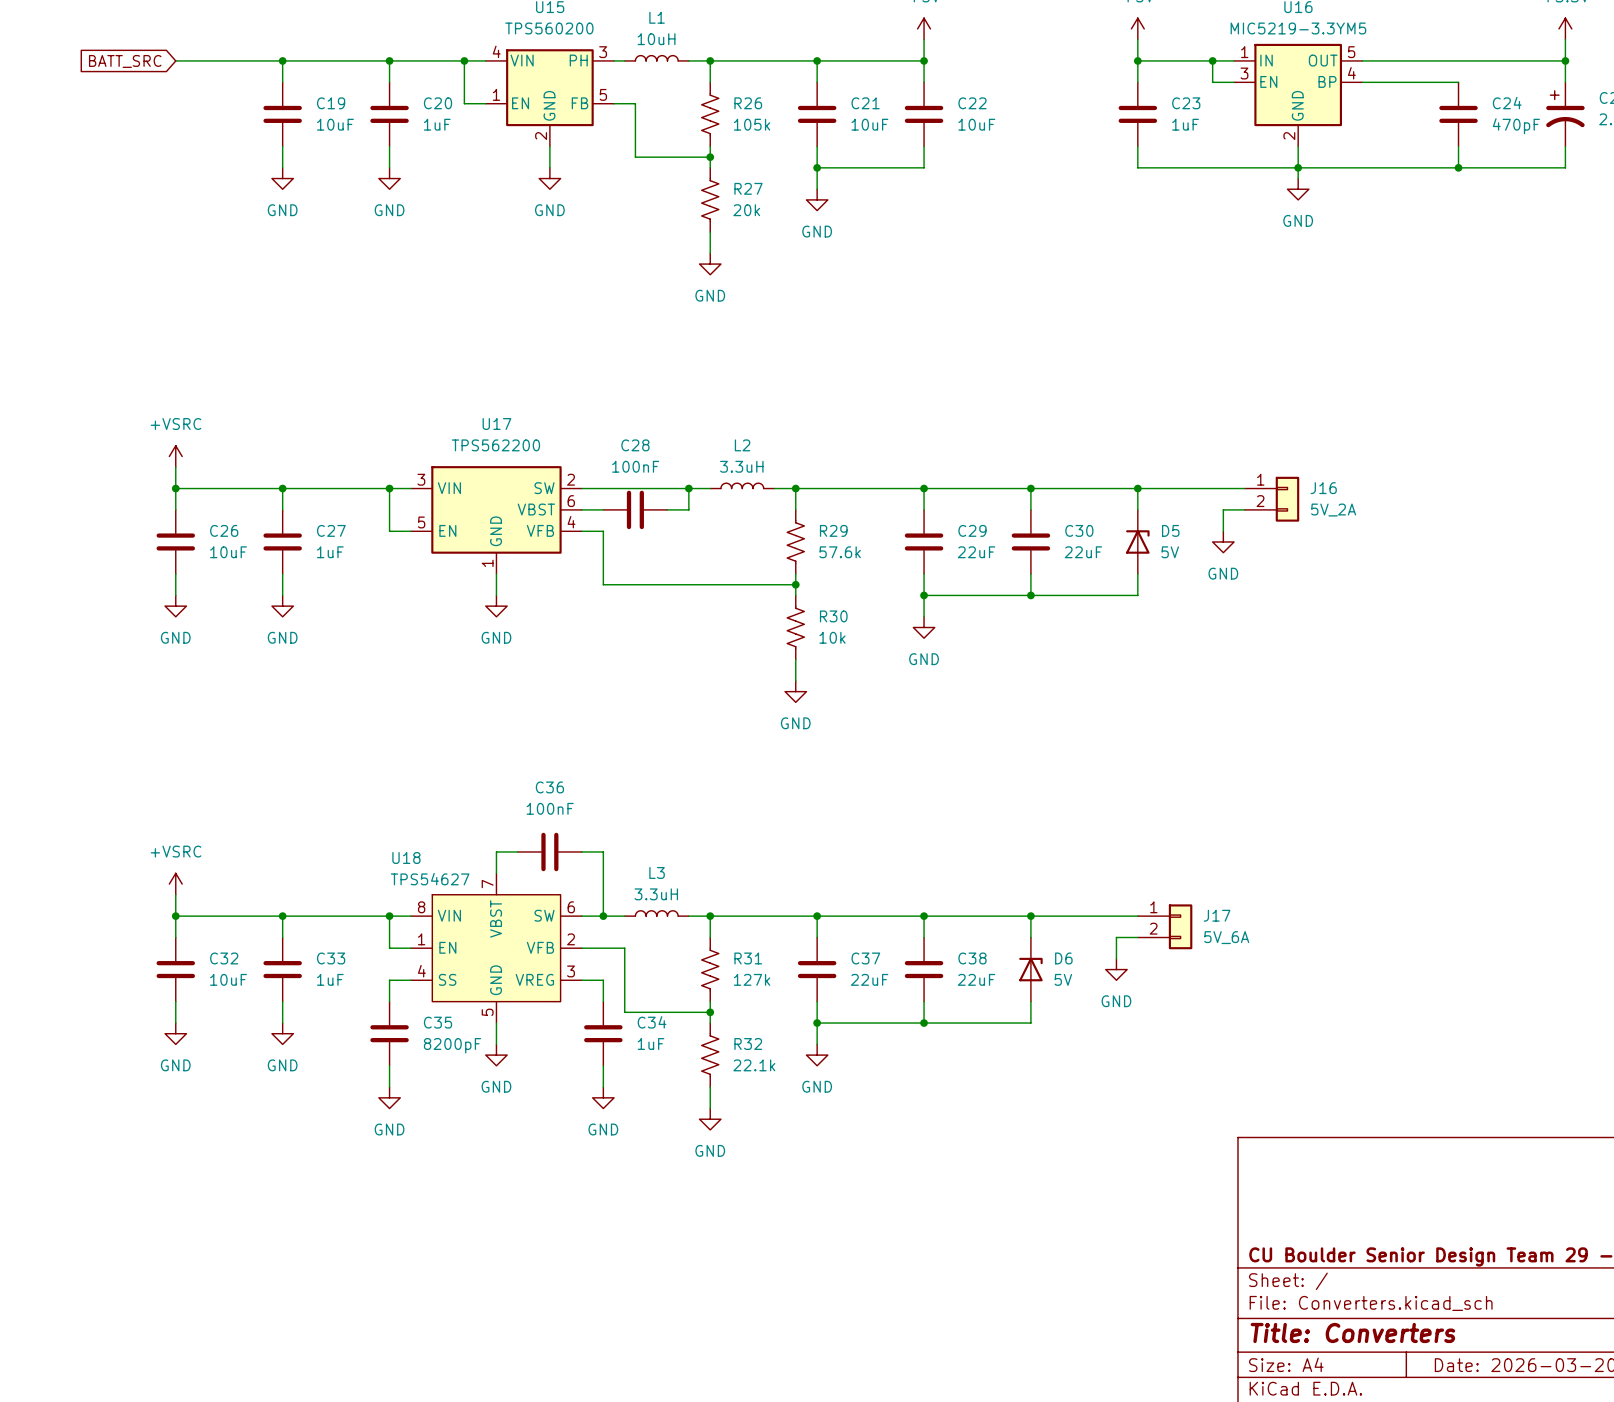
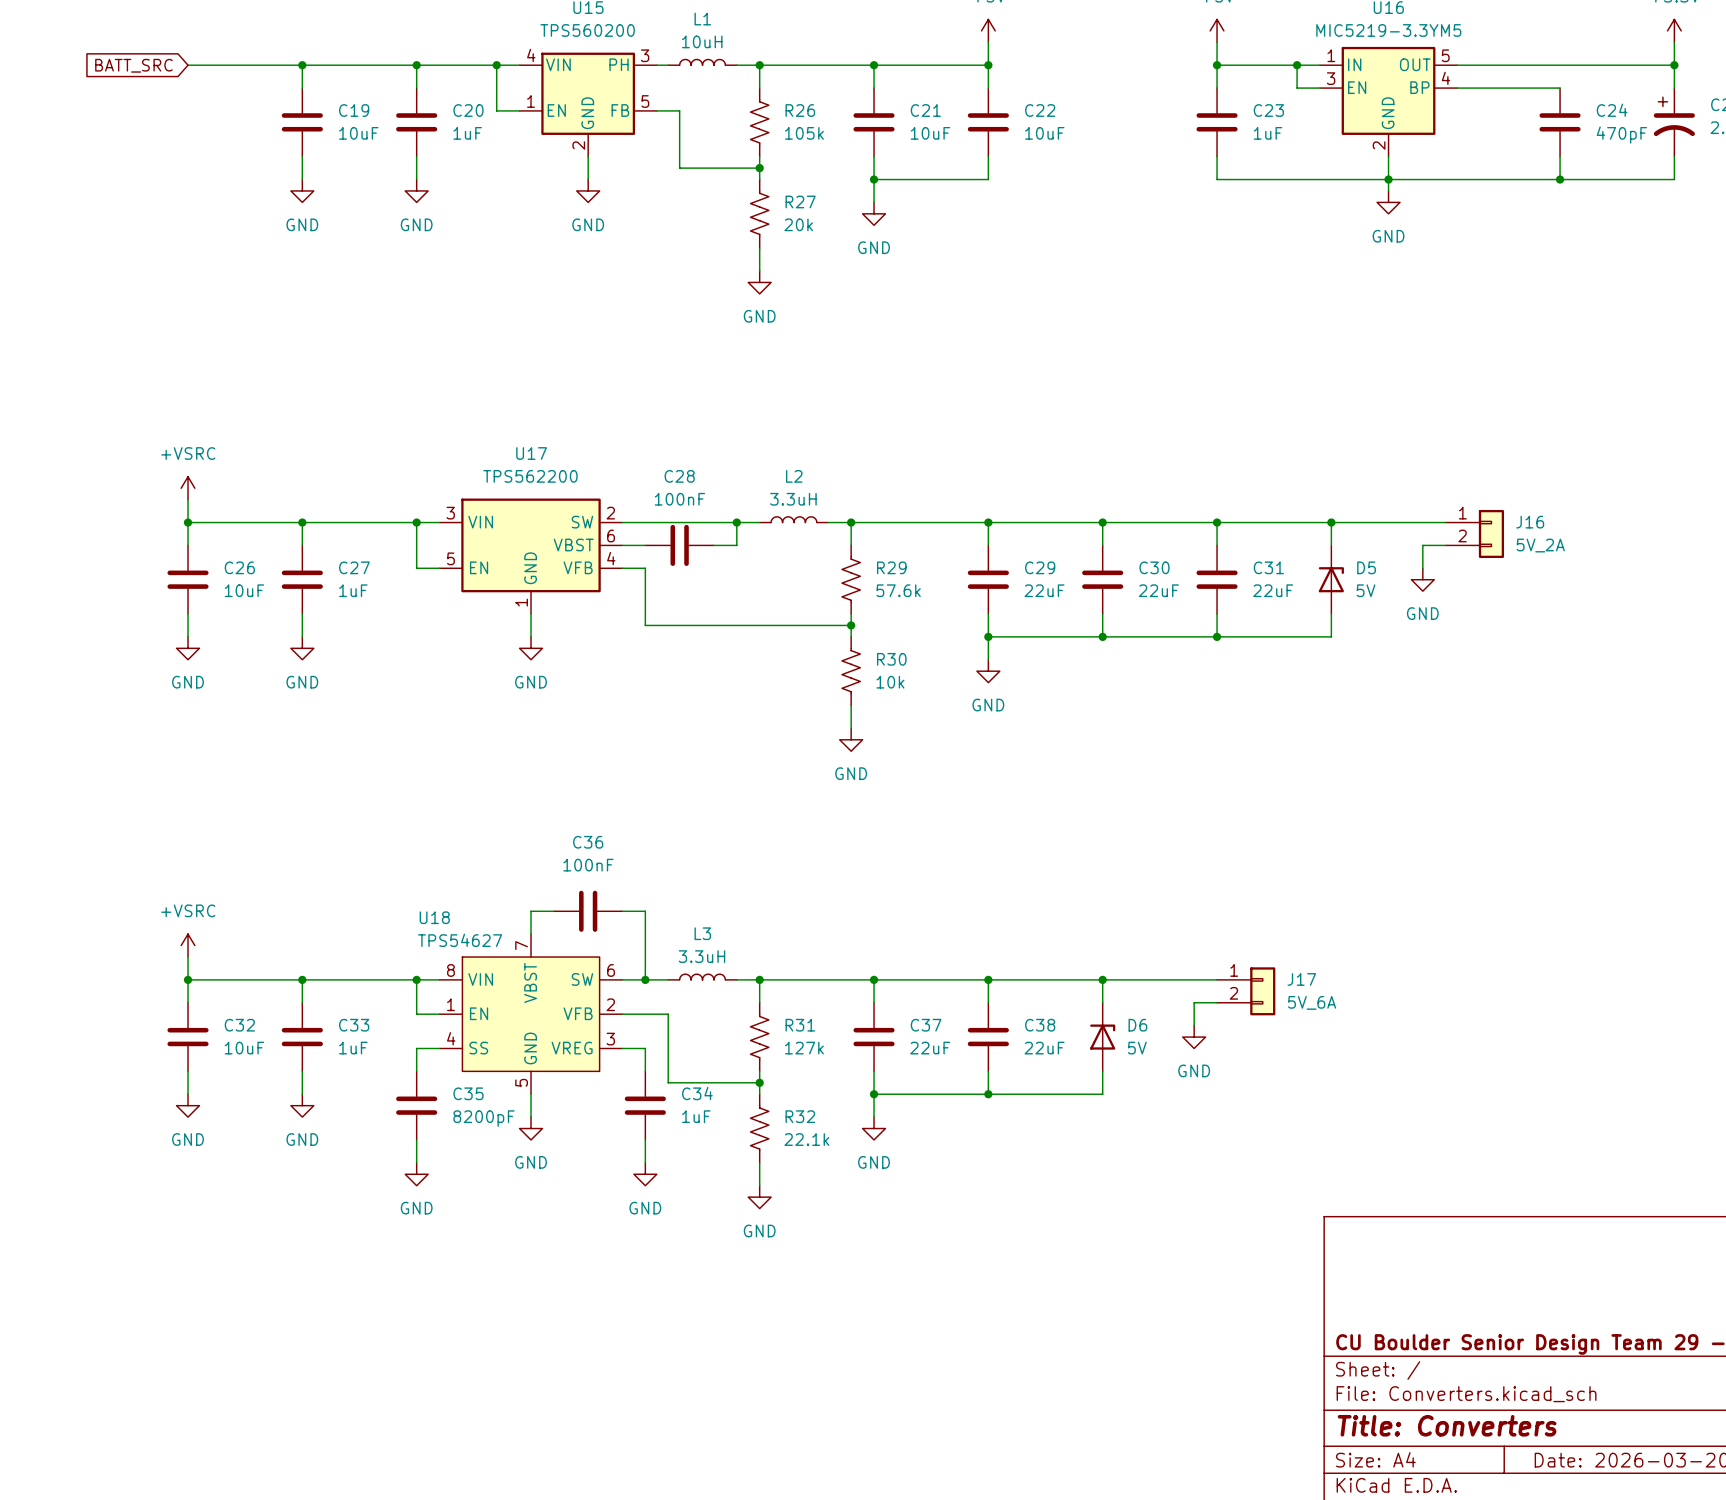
junction: none -> (1331, 522)
J16 position: (1271, 499) -> (1474, 533)
wire: (1244, 509) (1223, 509) (1223, 531) -> (1331, 545) (1331, 522) (1445, 522)
wire: none -> (1445, 545) (1422, 545) (1422, 568)
D5 position: (1137, 541) -> (1331, 579)
C31: none -> 22uF (1217, 579)
power symbol position: GND (1223, 541) -> GND (1422, 579)
wire: none -> (1331, 614) (1331, 636) (1217, 636)
junction: none -> (1217, 636)

